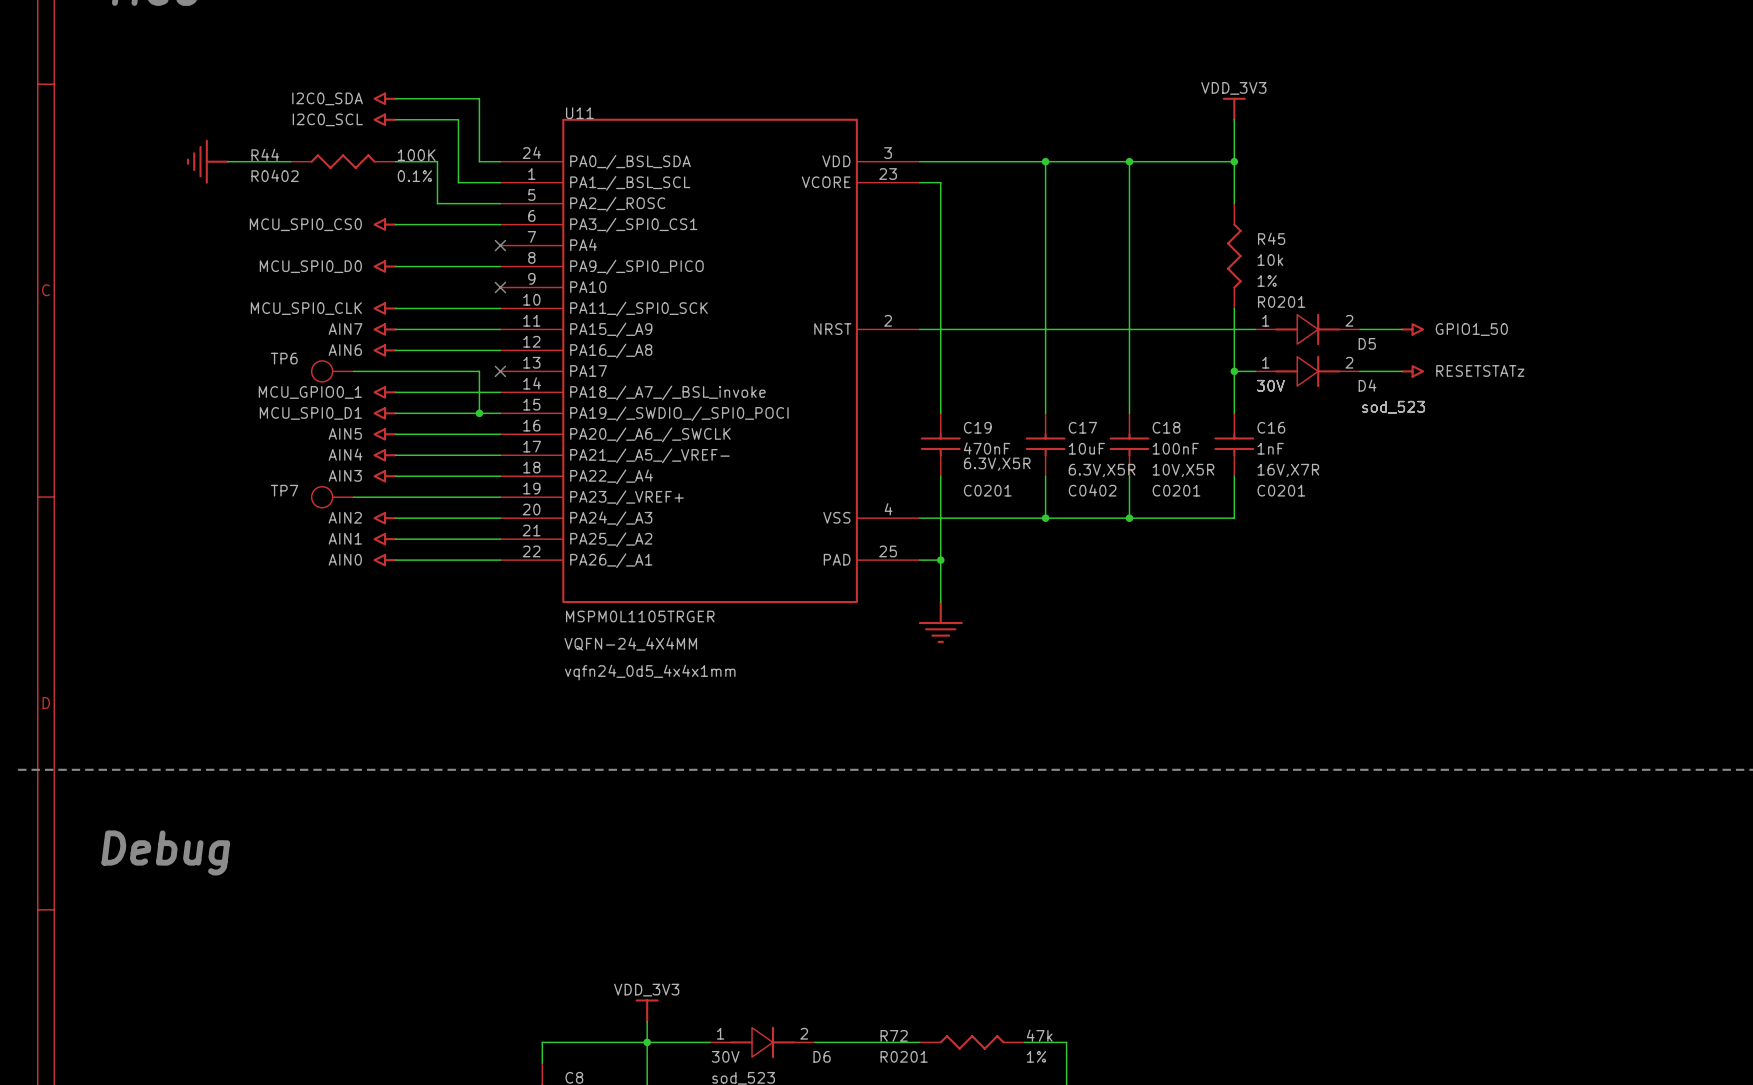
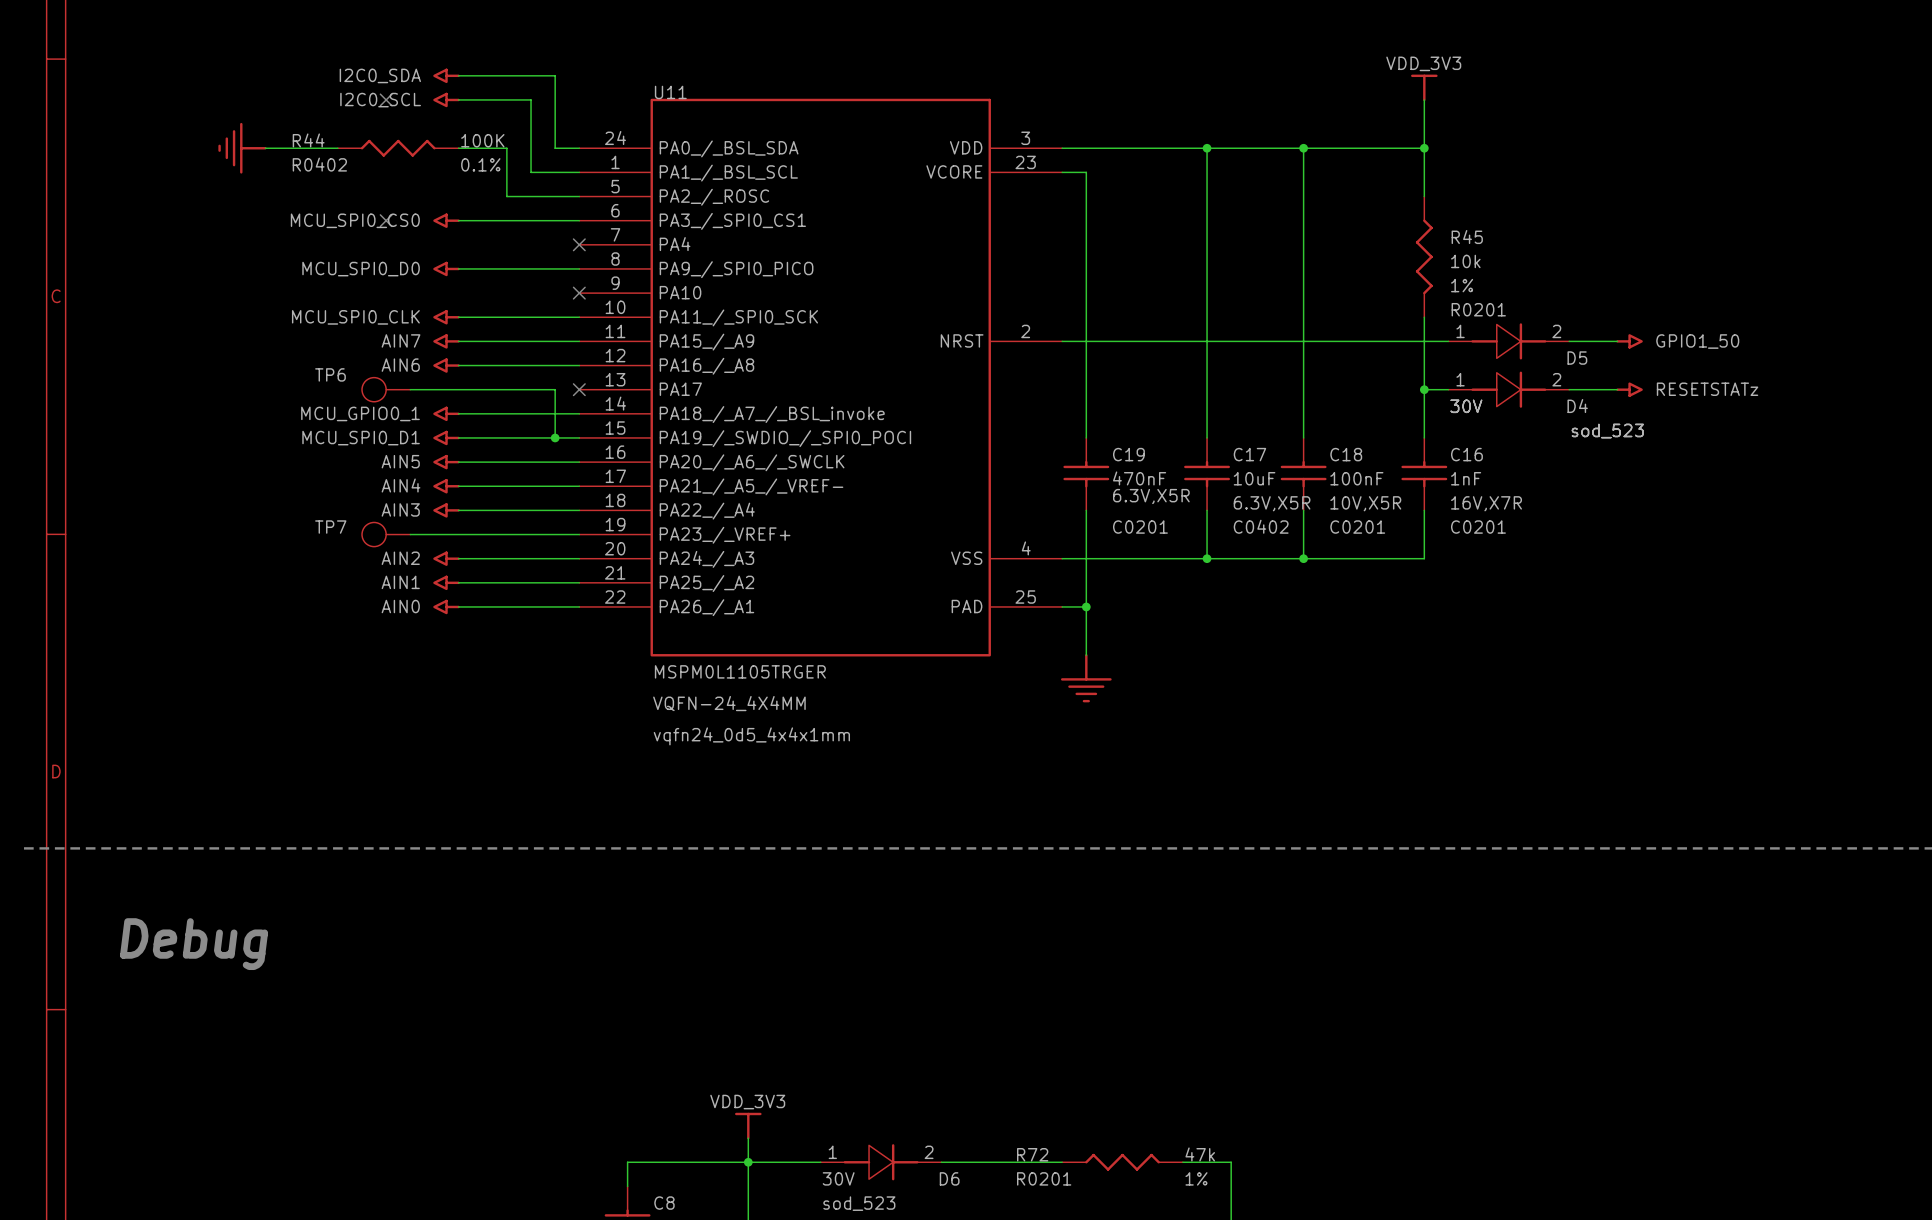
no-connect mark: none -> (386, 99)
no-connect mark: none -> (386, 220)

